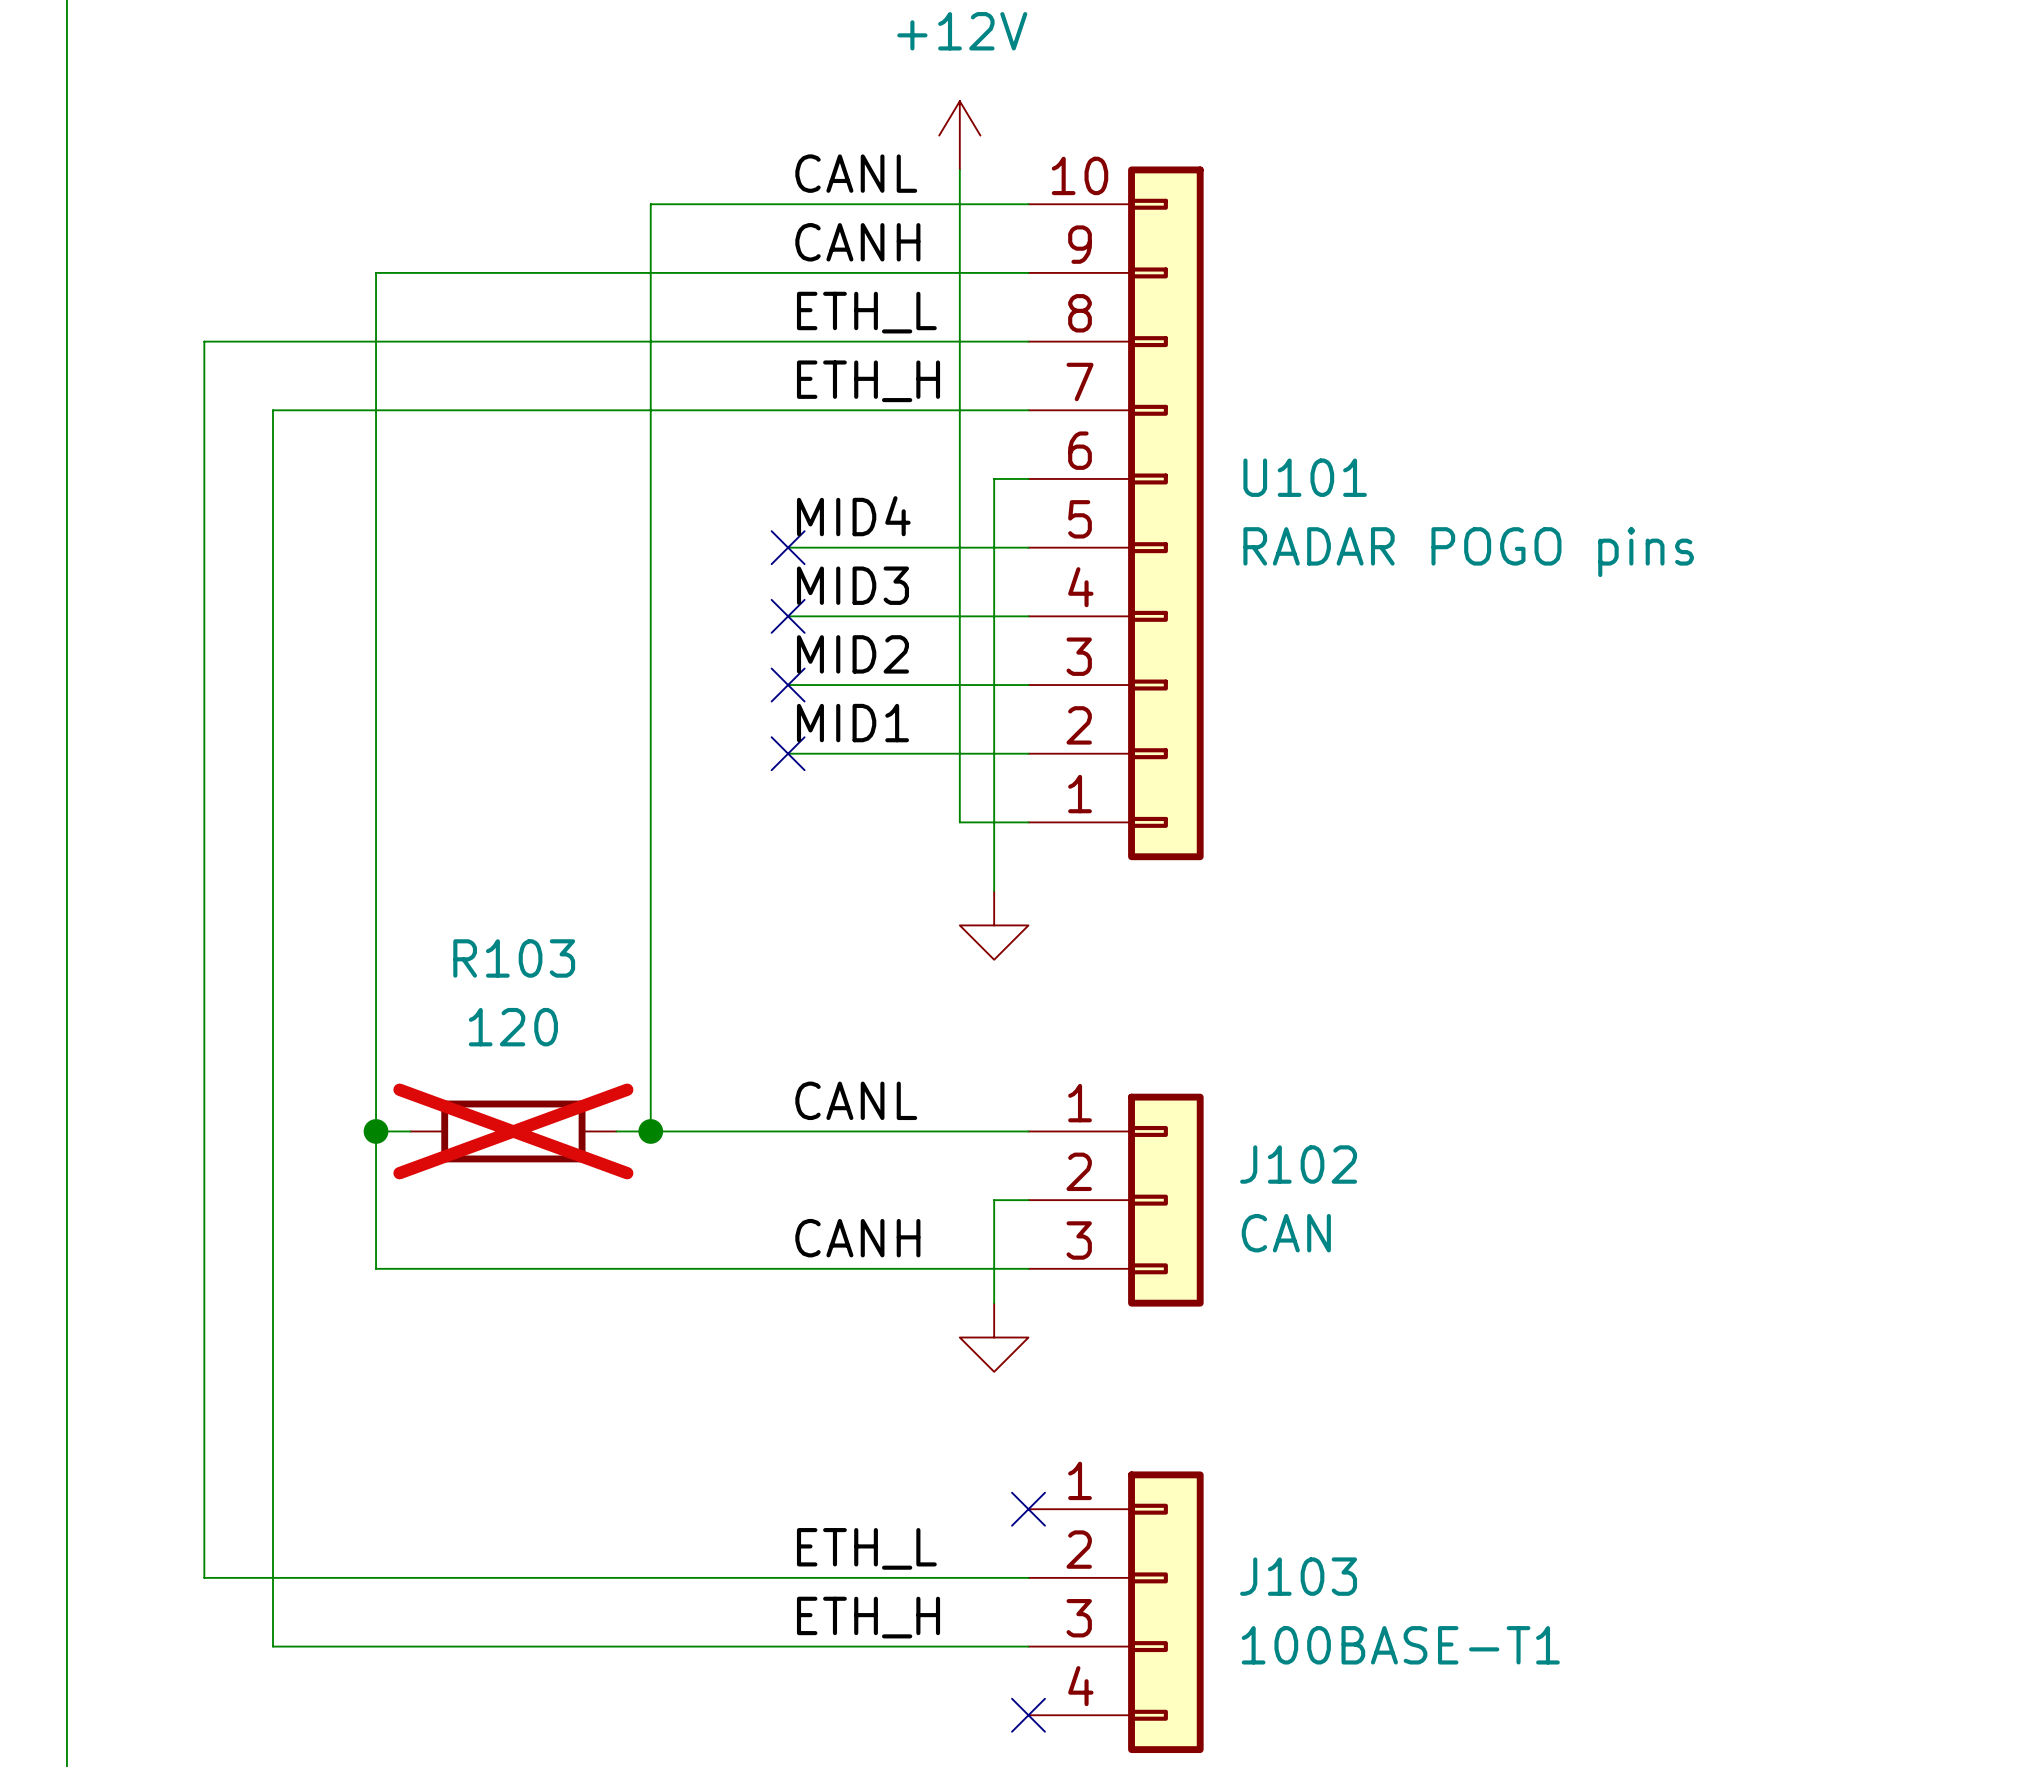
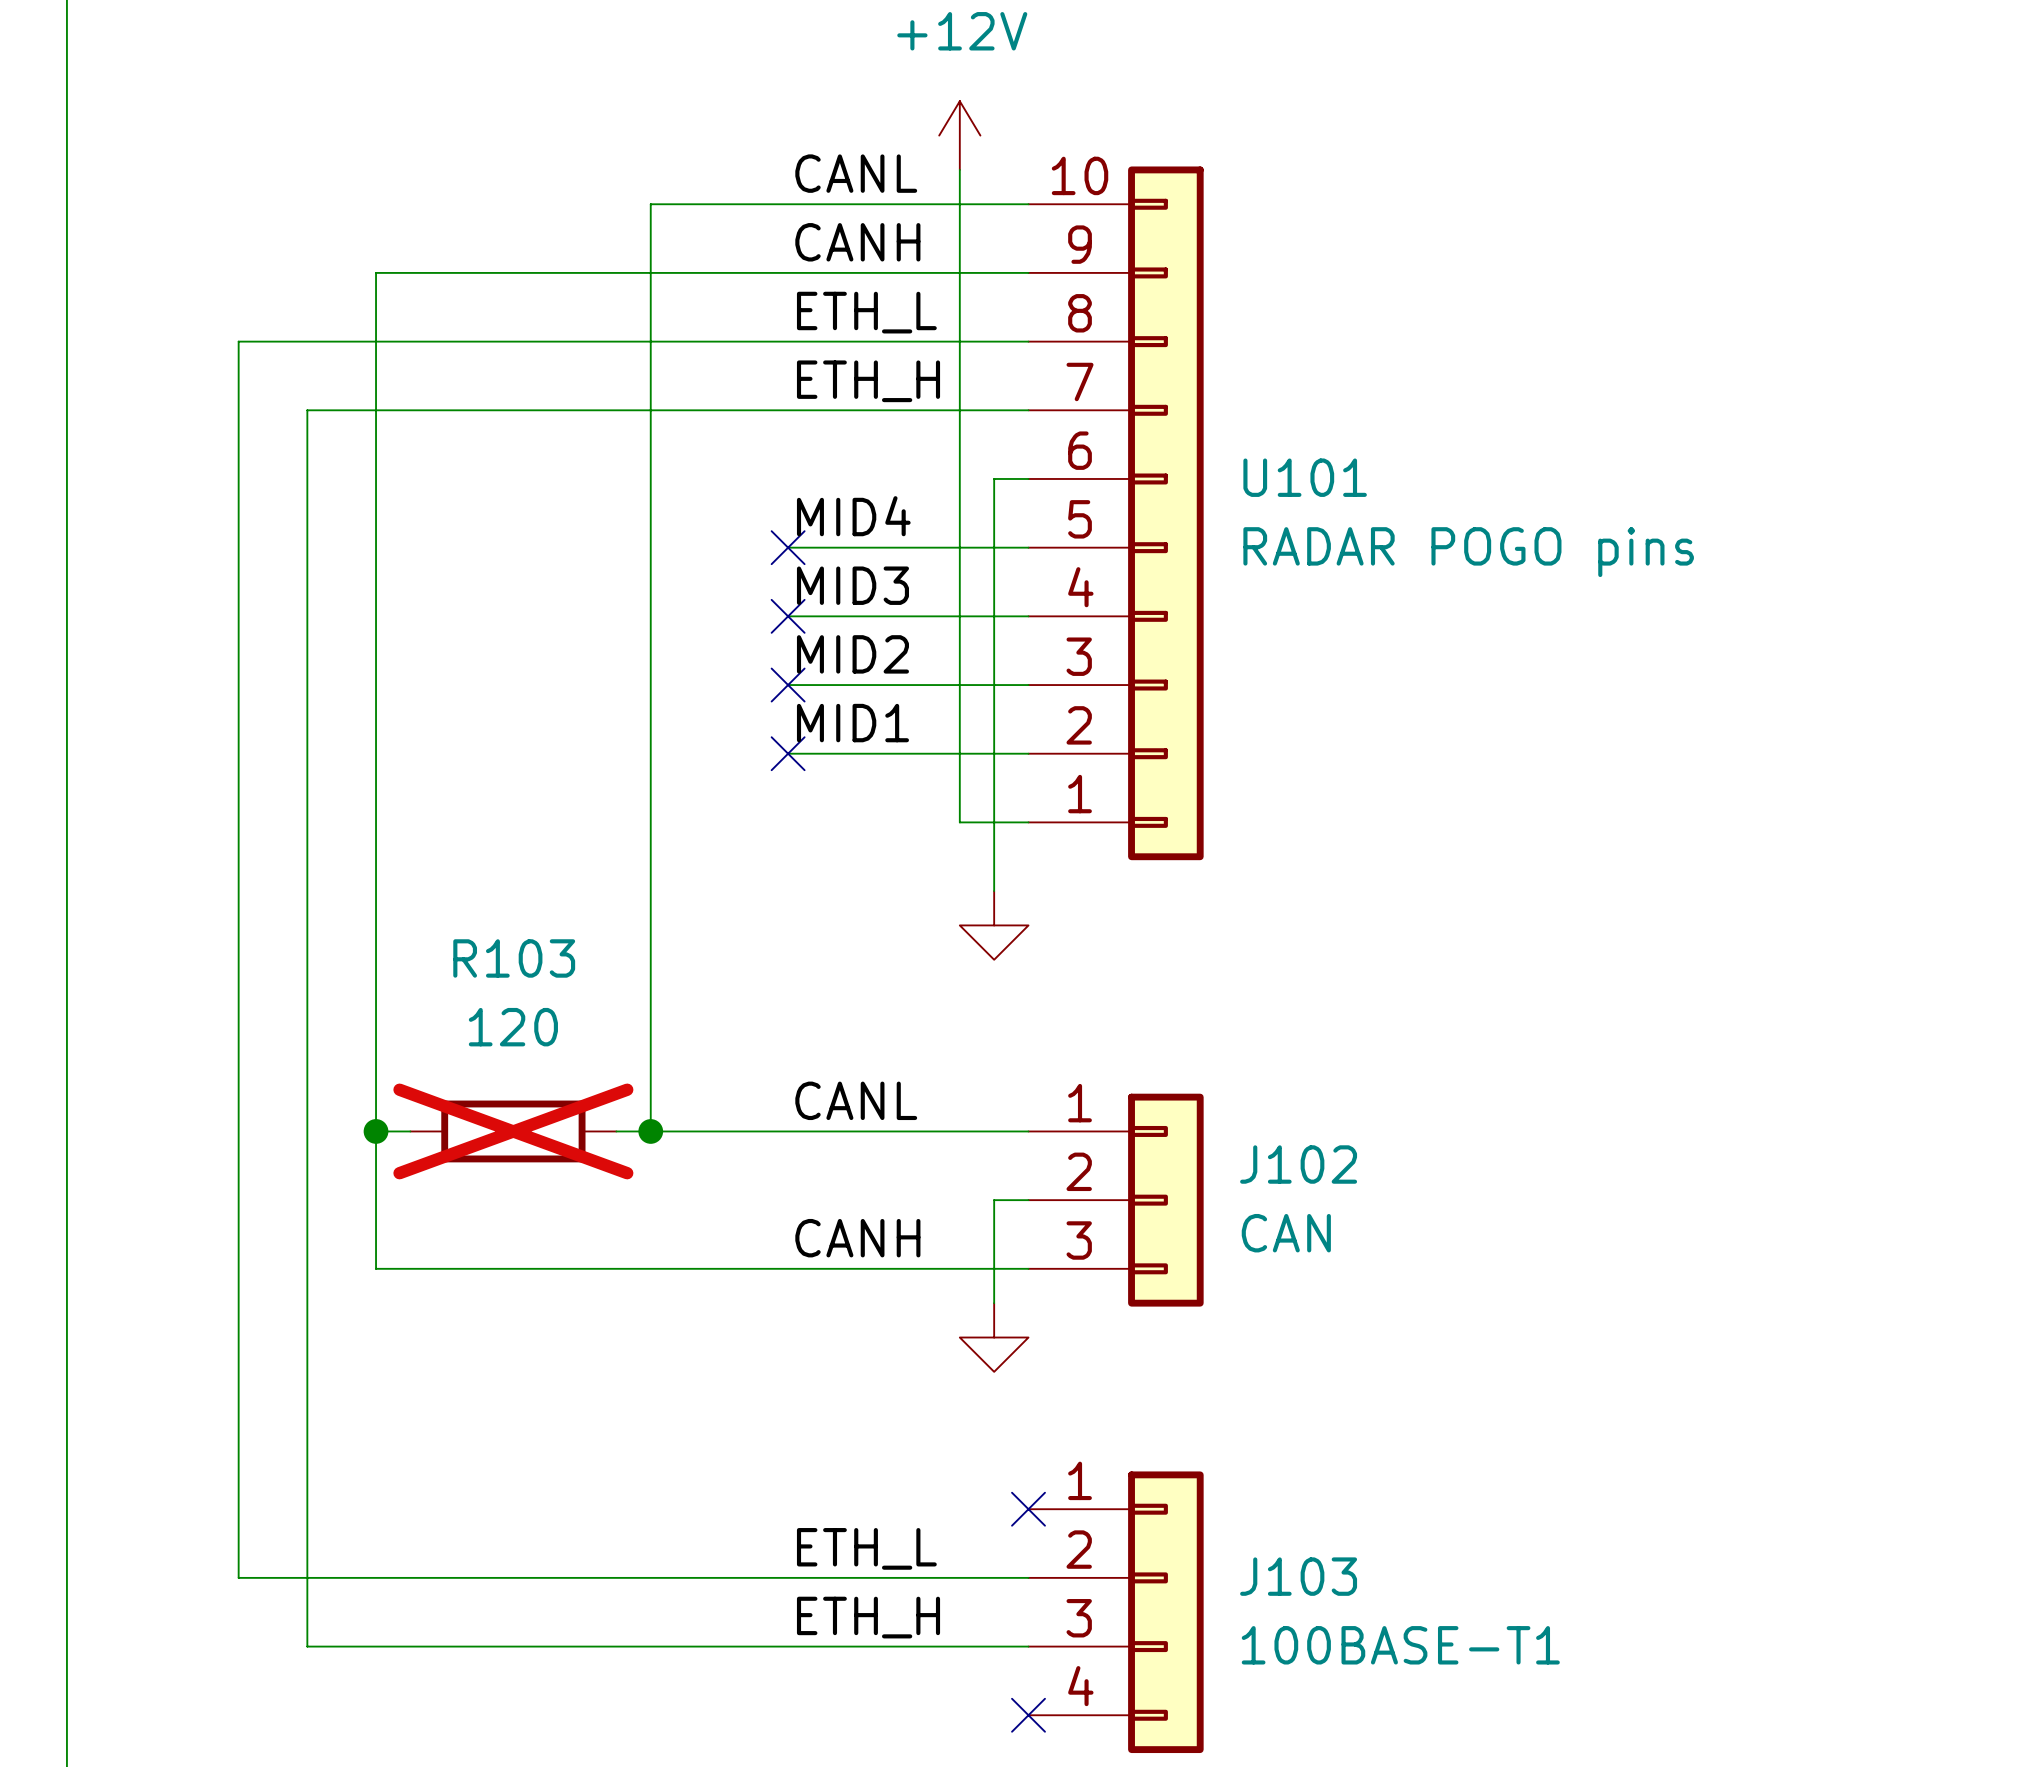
wire: (238, 341) (204, 341) (204, 1577) (238, 1577) -> (238, 341) (238, 1577)
wire: (307, 410) (273, 410) (273, 1646) (307, 1646) -> (307, 410) (307, 1646)

